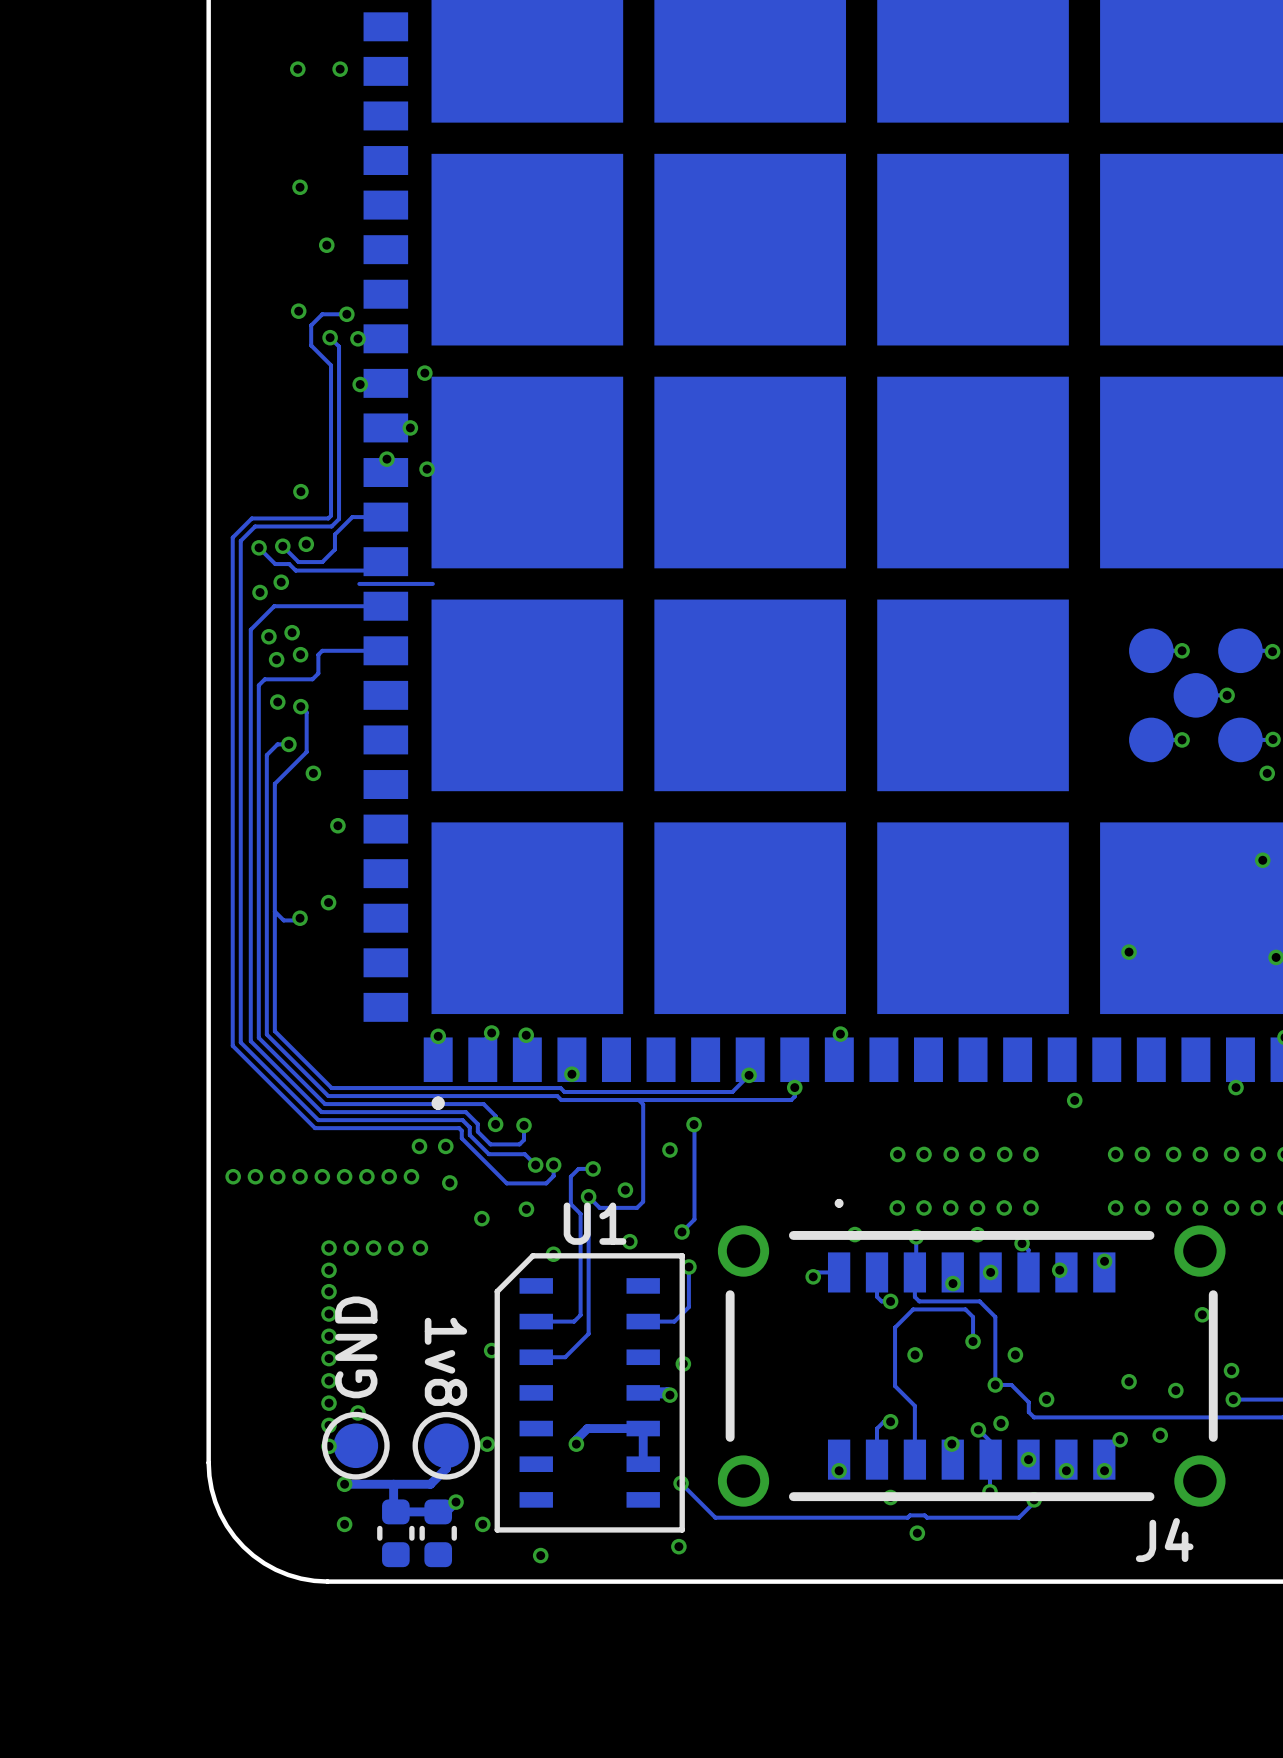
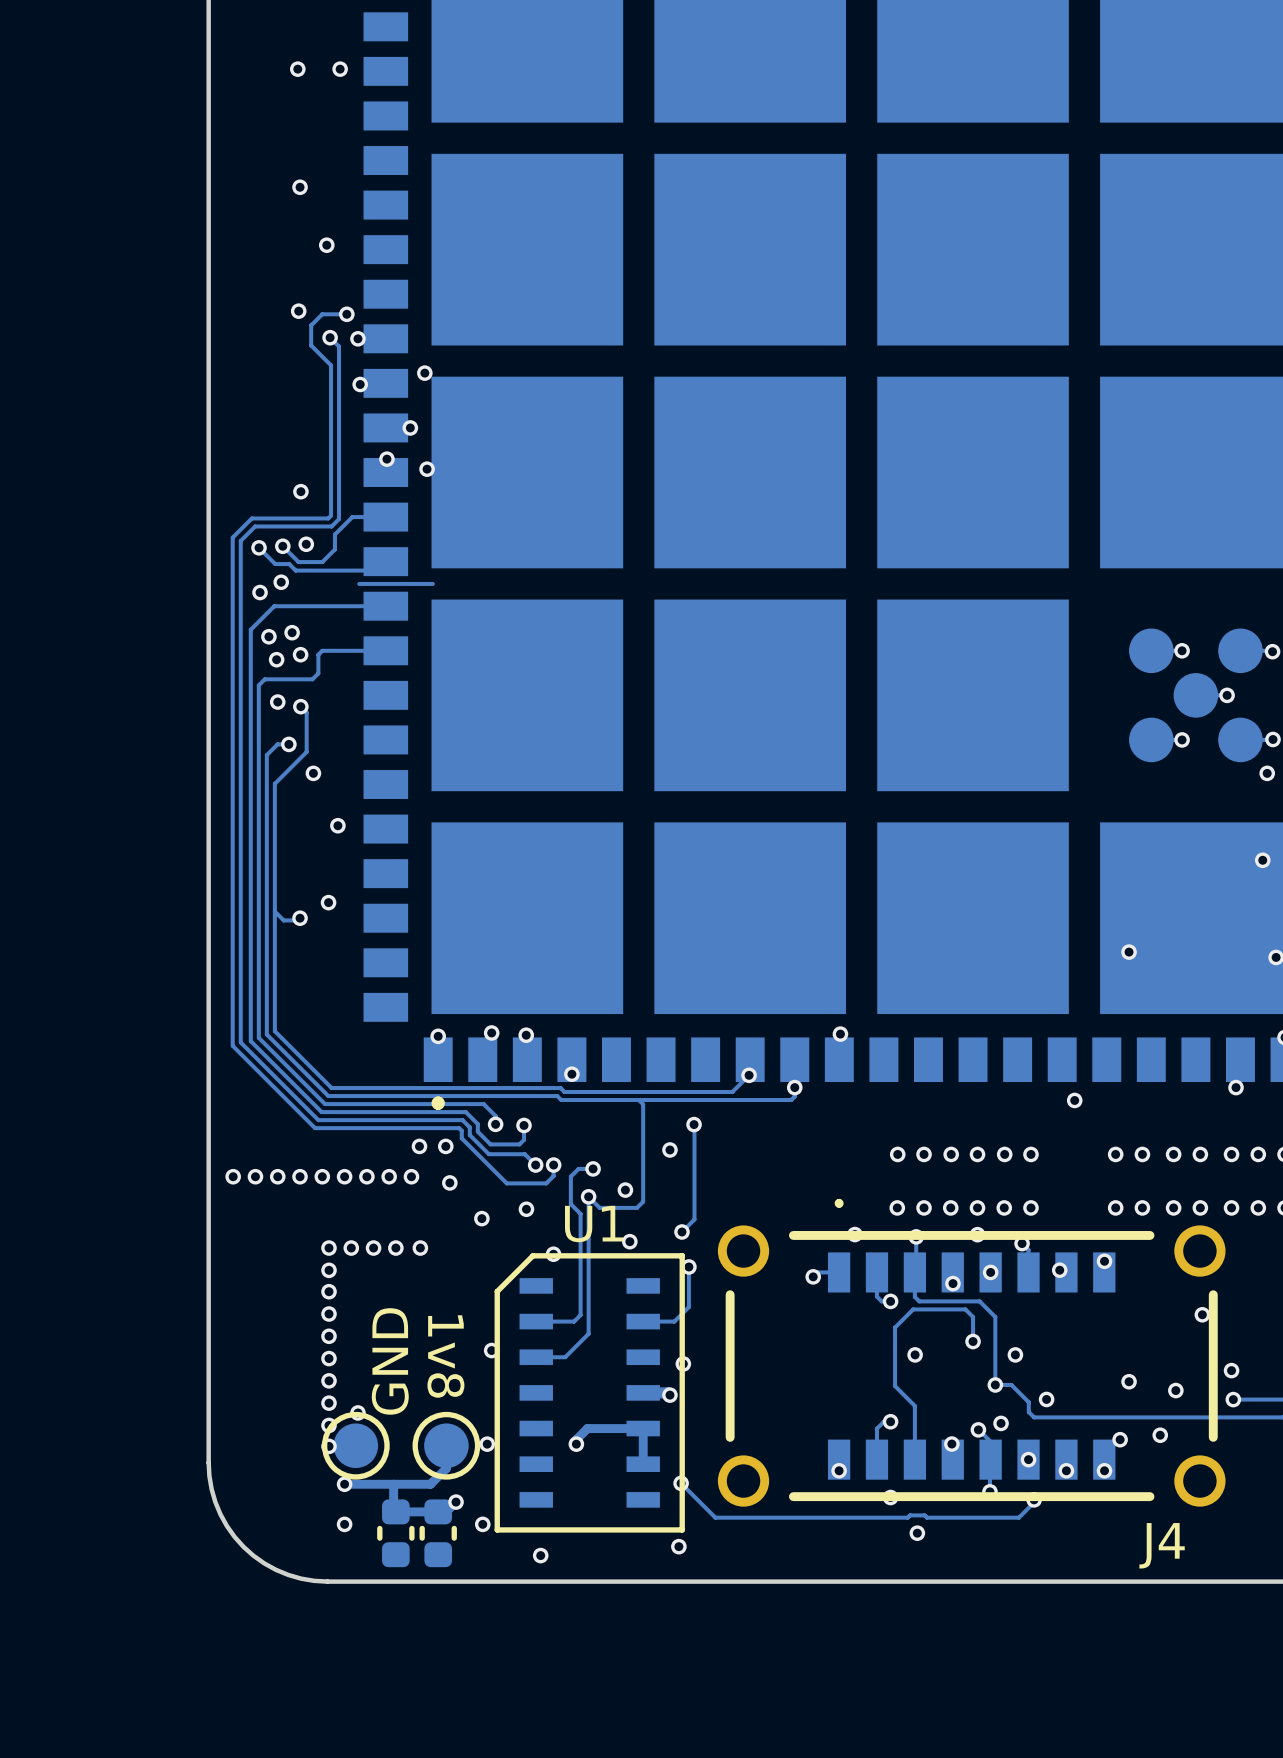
text position: GND (356, 1347) -> GND (390, 1361)

